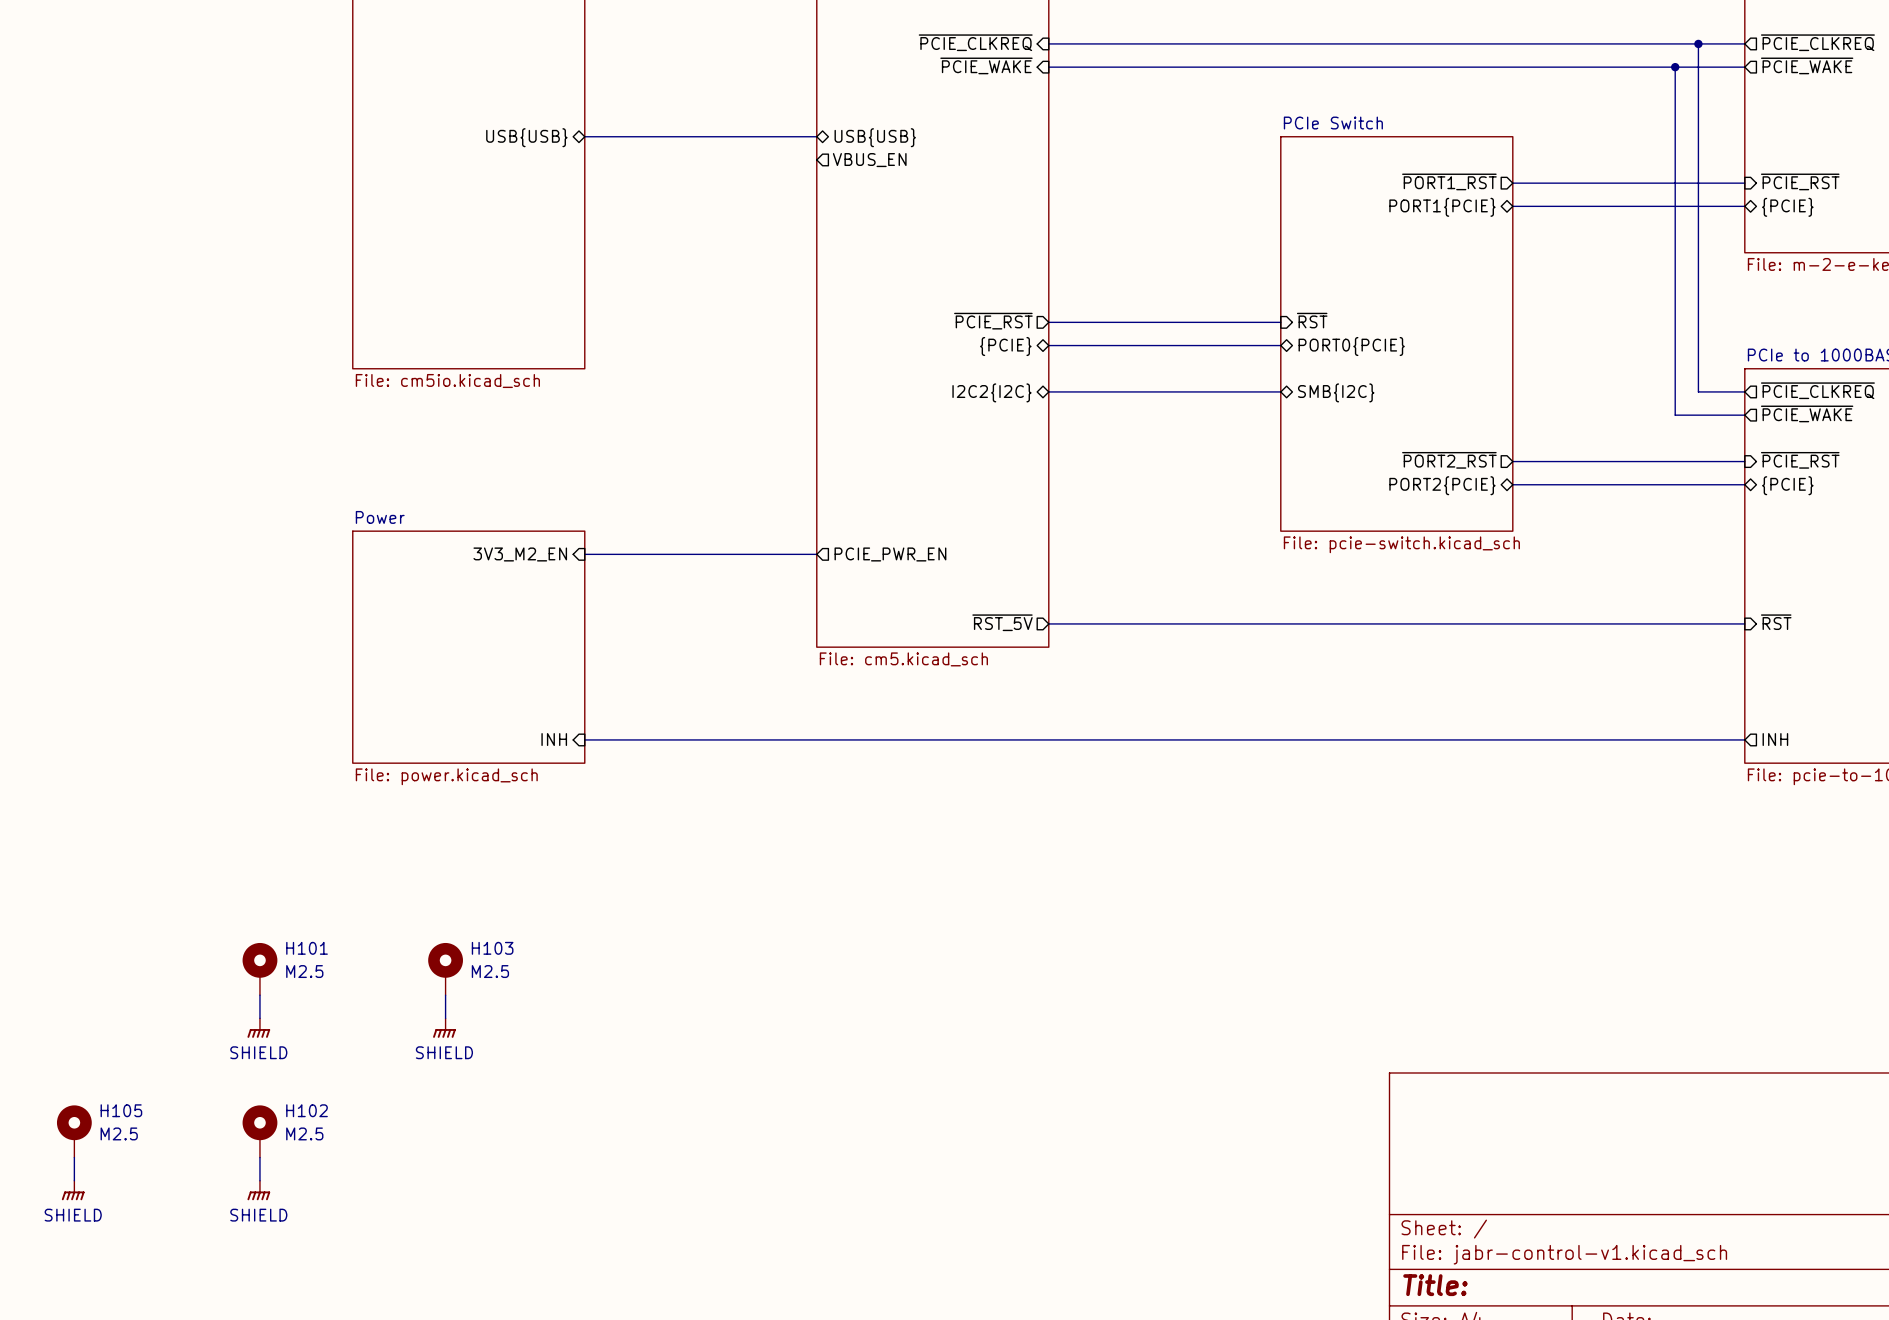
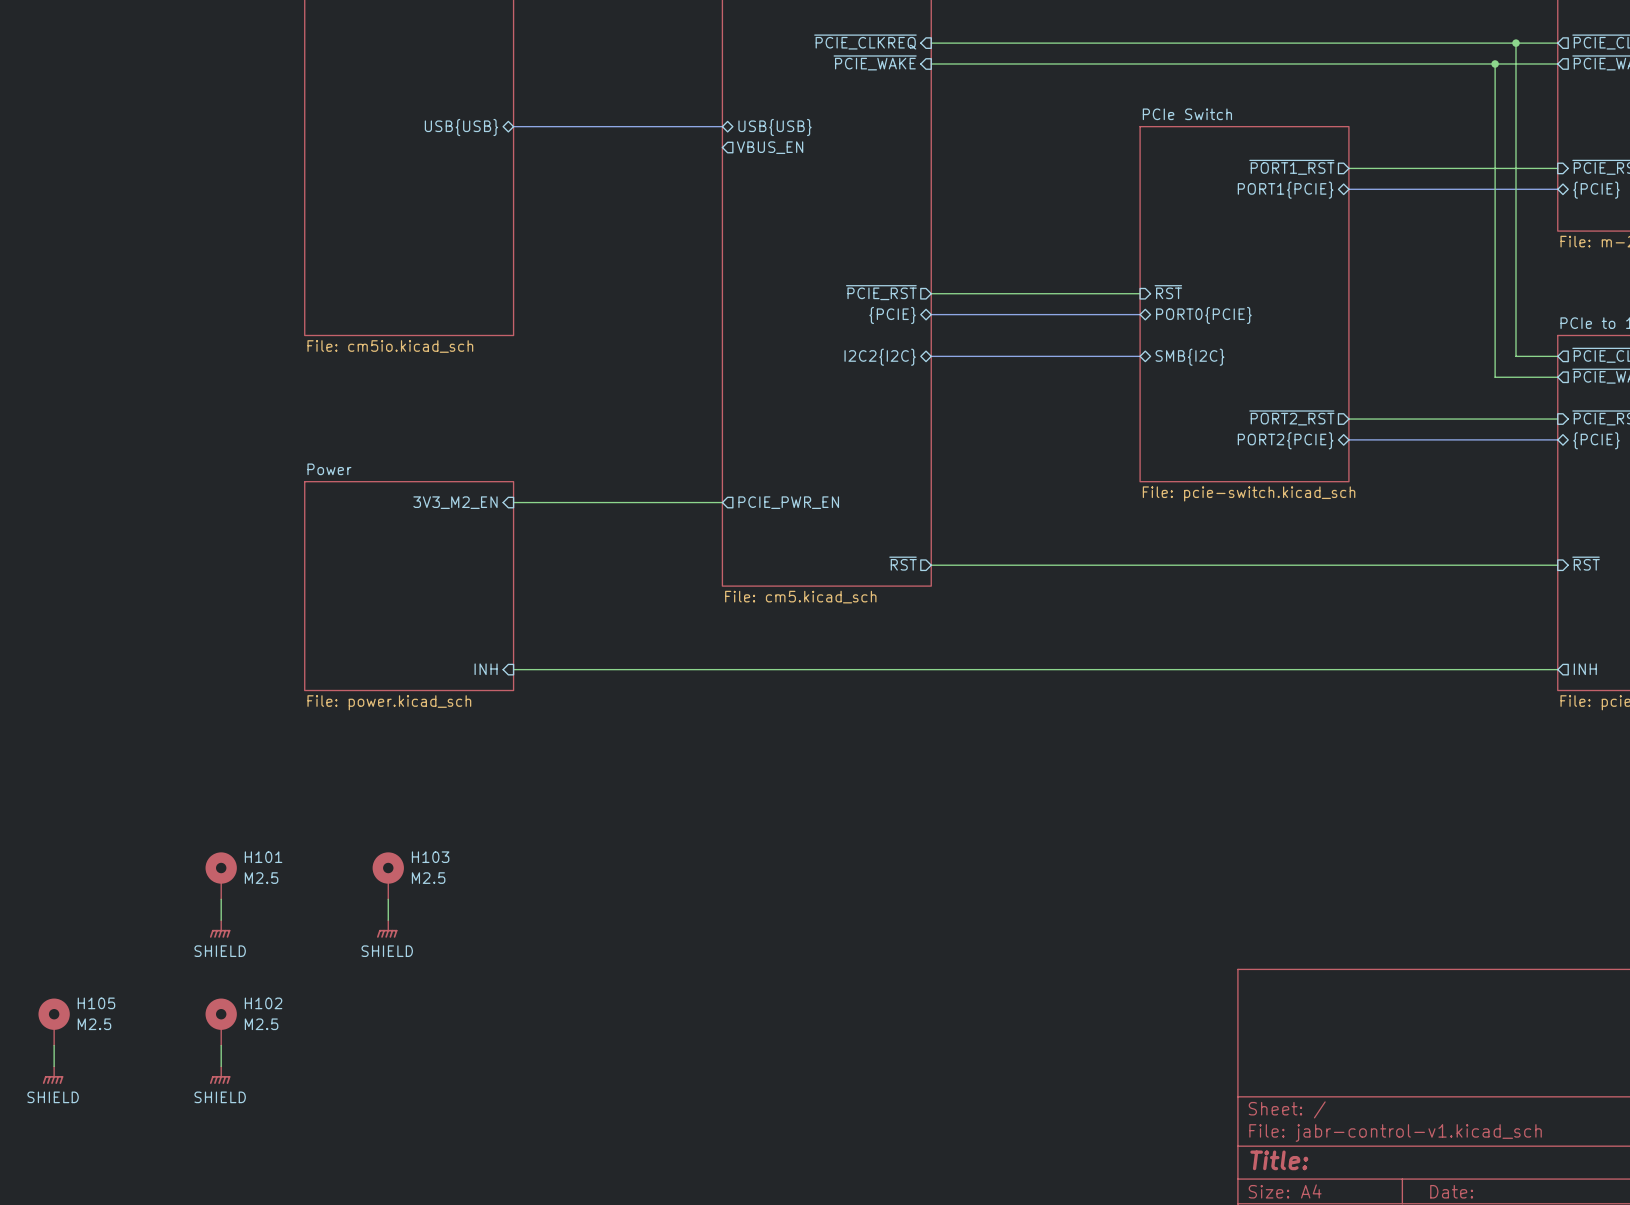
sheet pin: ~{RST_5V} (1002, 622) -> ~{RST} (903, 563)

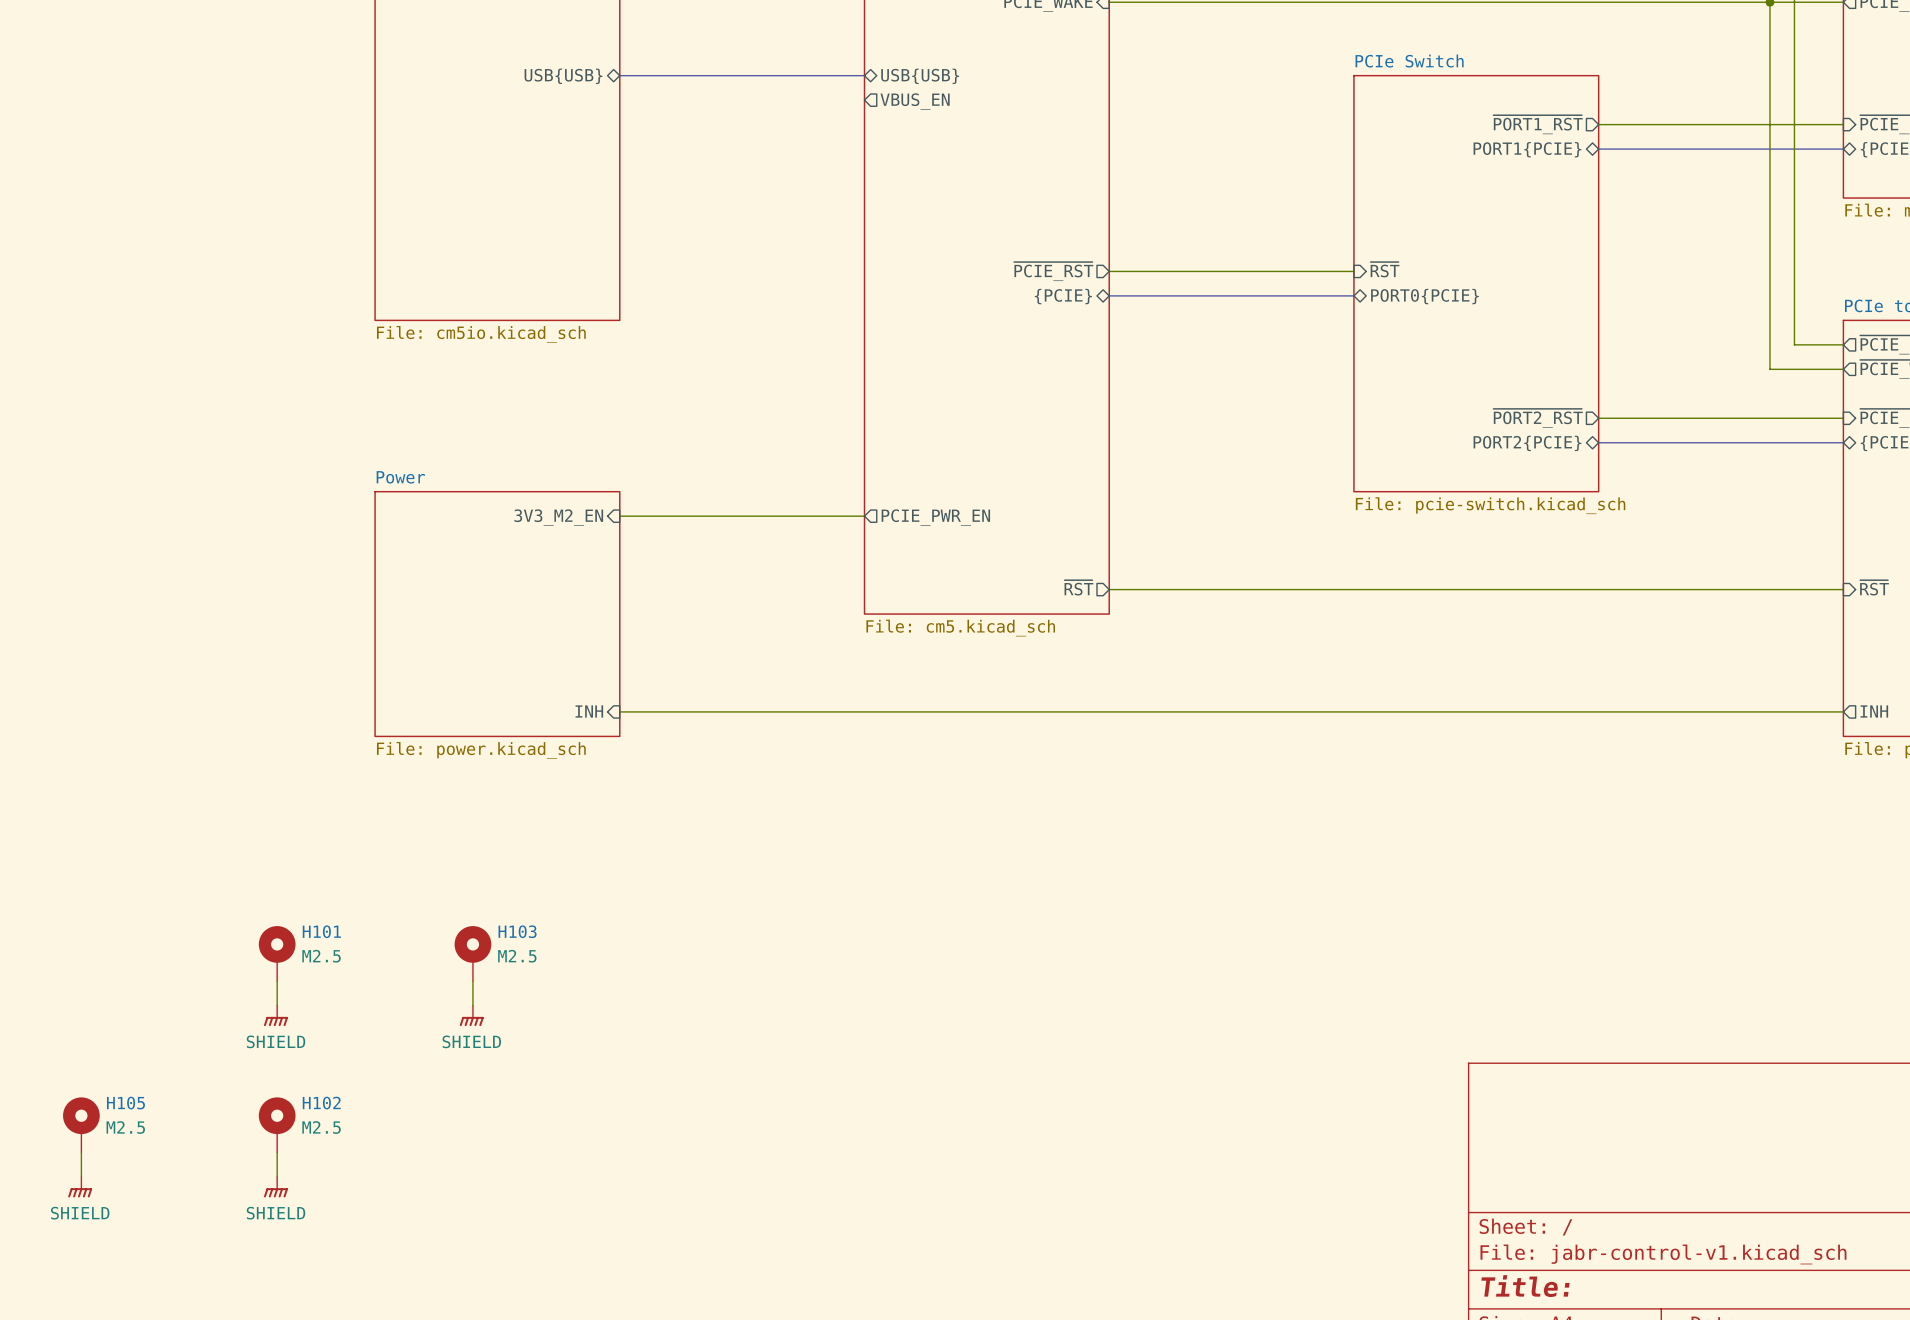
bus: (931, 356) (1140, 356) -> none
sheet pin: I2C2{I2C} (880, 357) -> none
sheet pin: SMB{I2C} (1189, 357) -> none

